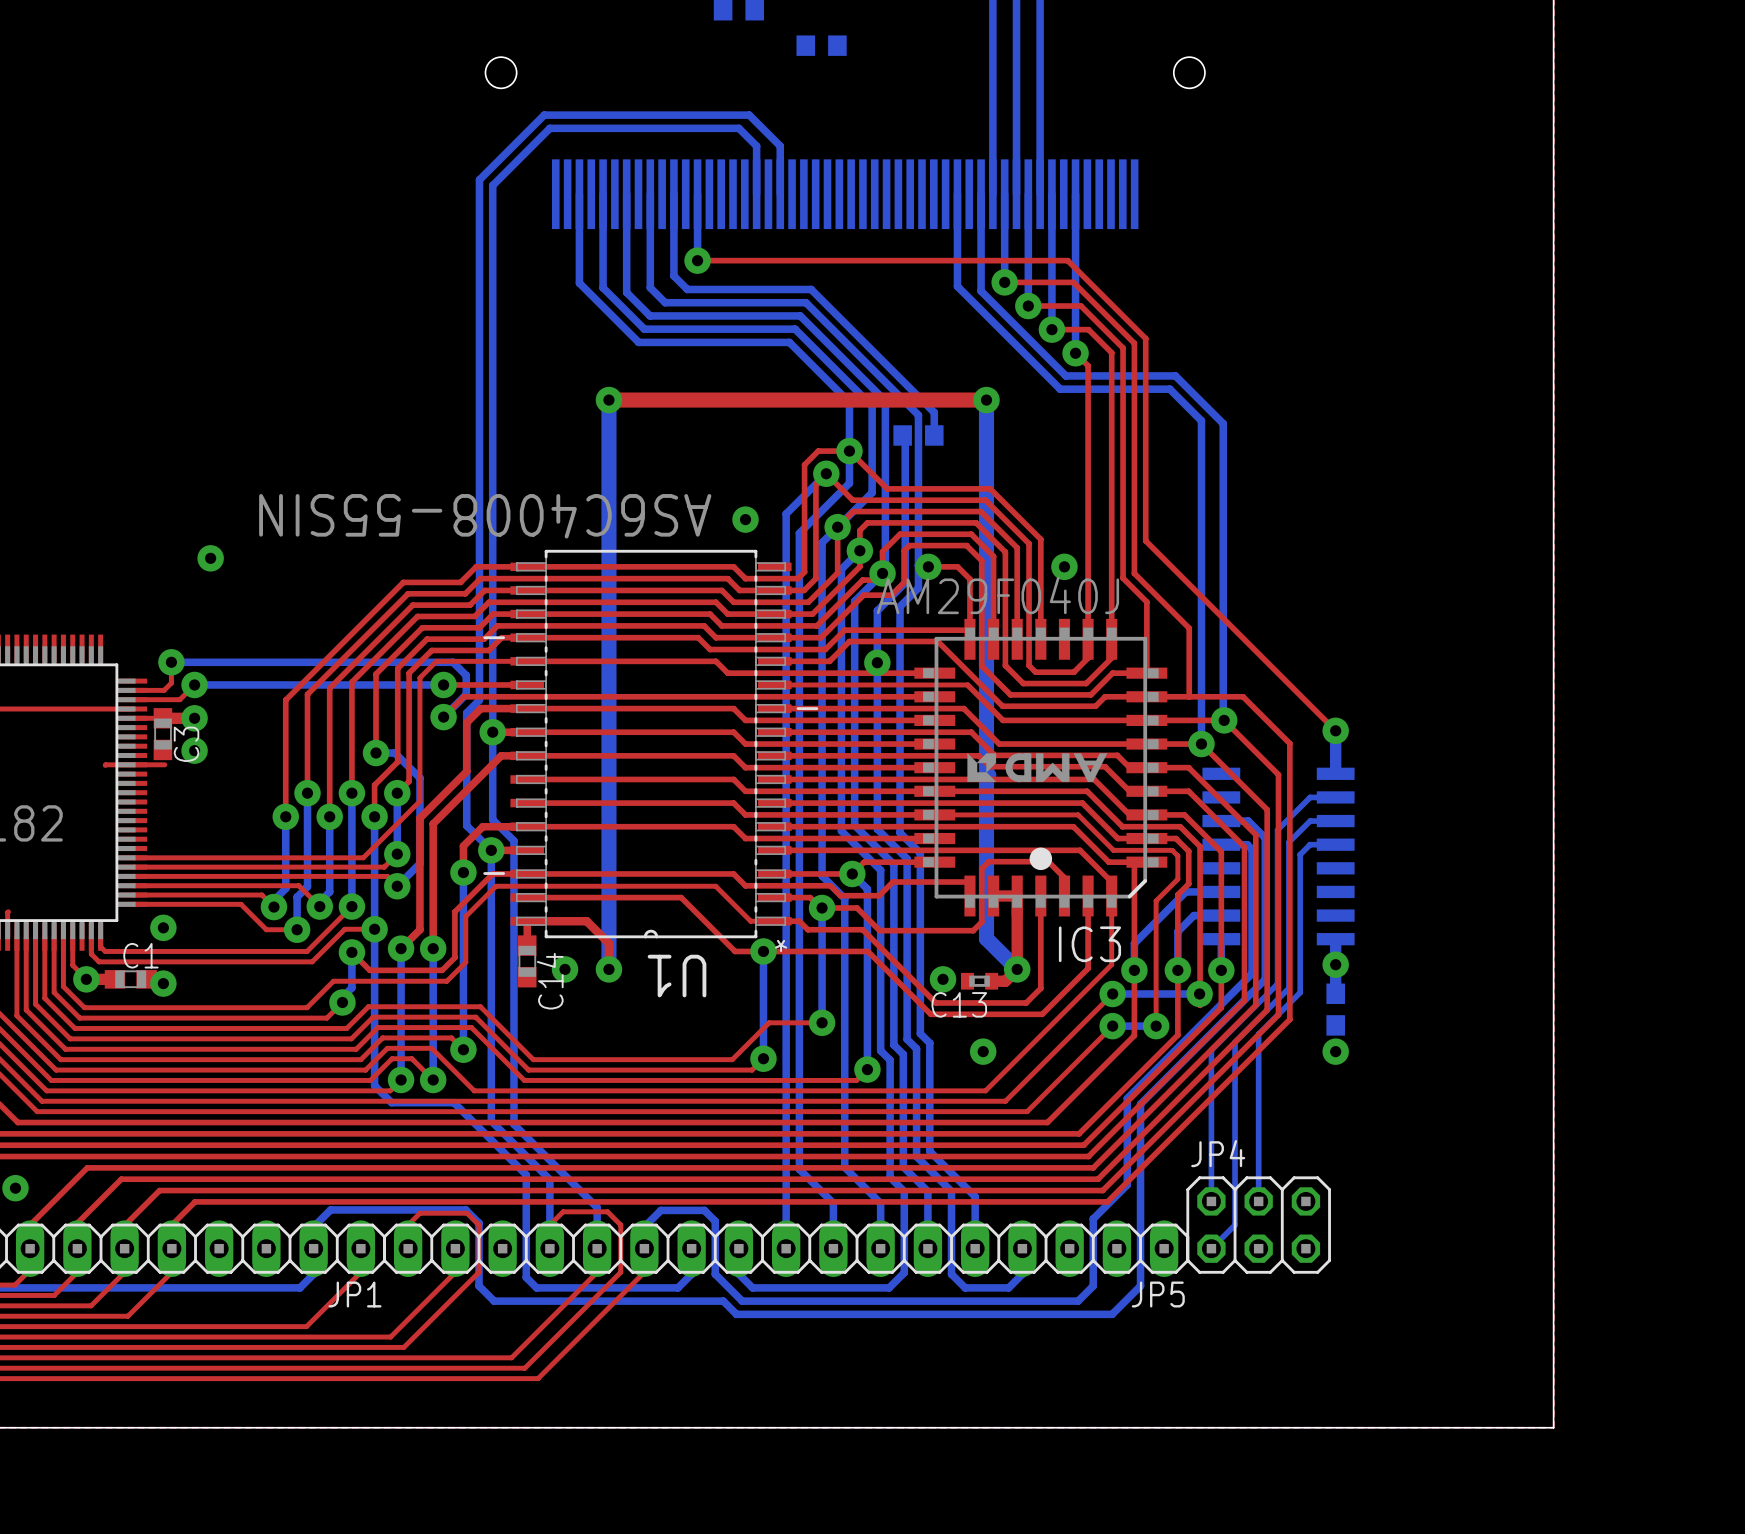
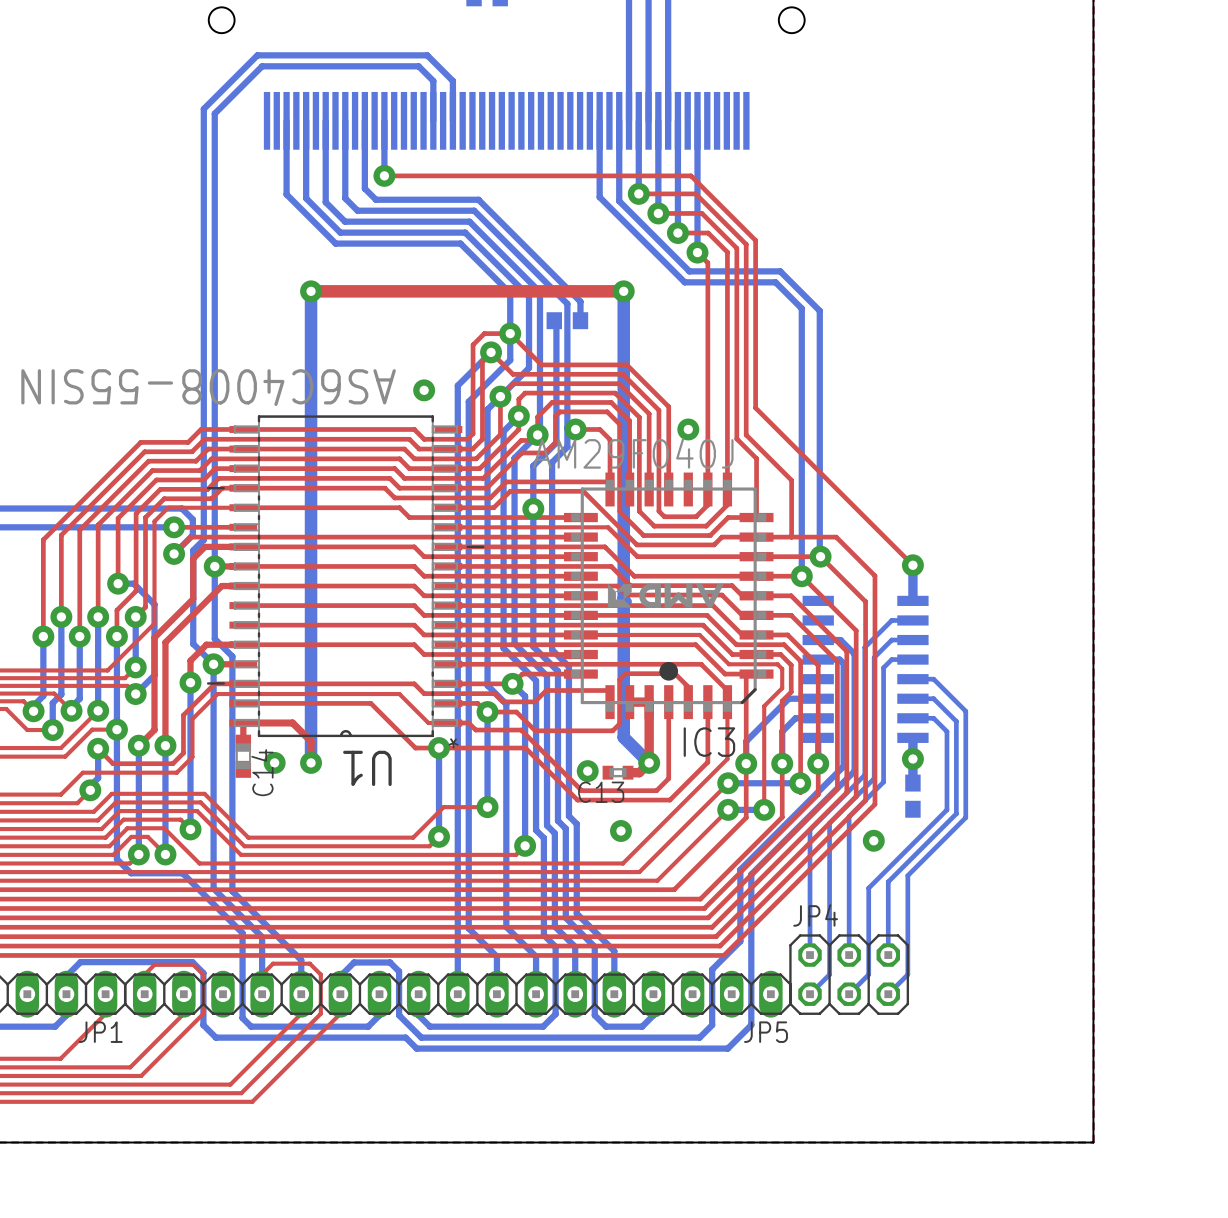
bottom track: none -> (912, 679) (933, 679) (965, 711) (965, 817) (907, 875) (907, 974) (888, 994)
bottom track: none -> (912, 698) (933, 698) (956, 721) (956, 813) (888, 881) (888, 955)
bottom track: none -> (912, 718) (933, 718) (946, 731) (946, 809) (868, 888) (868, 974) (849, 994)
via position: (1335, 1051) -> (873, 840)

